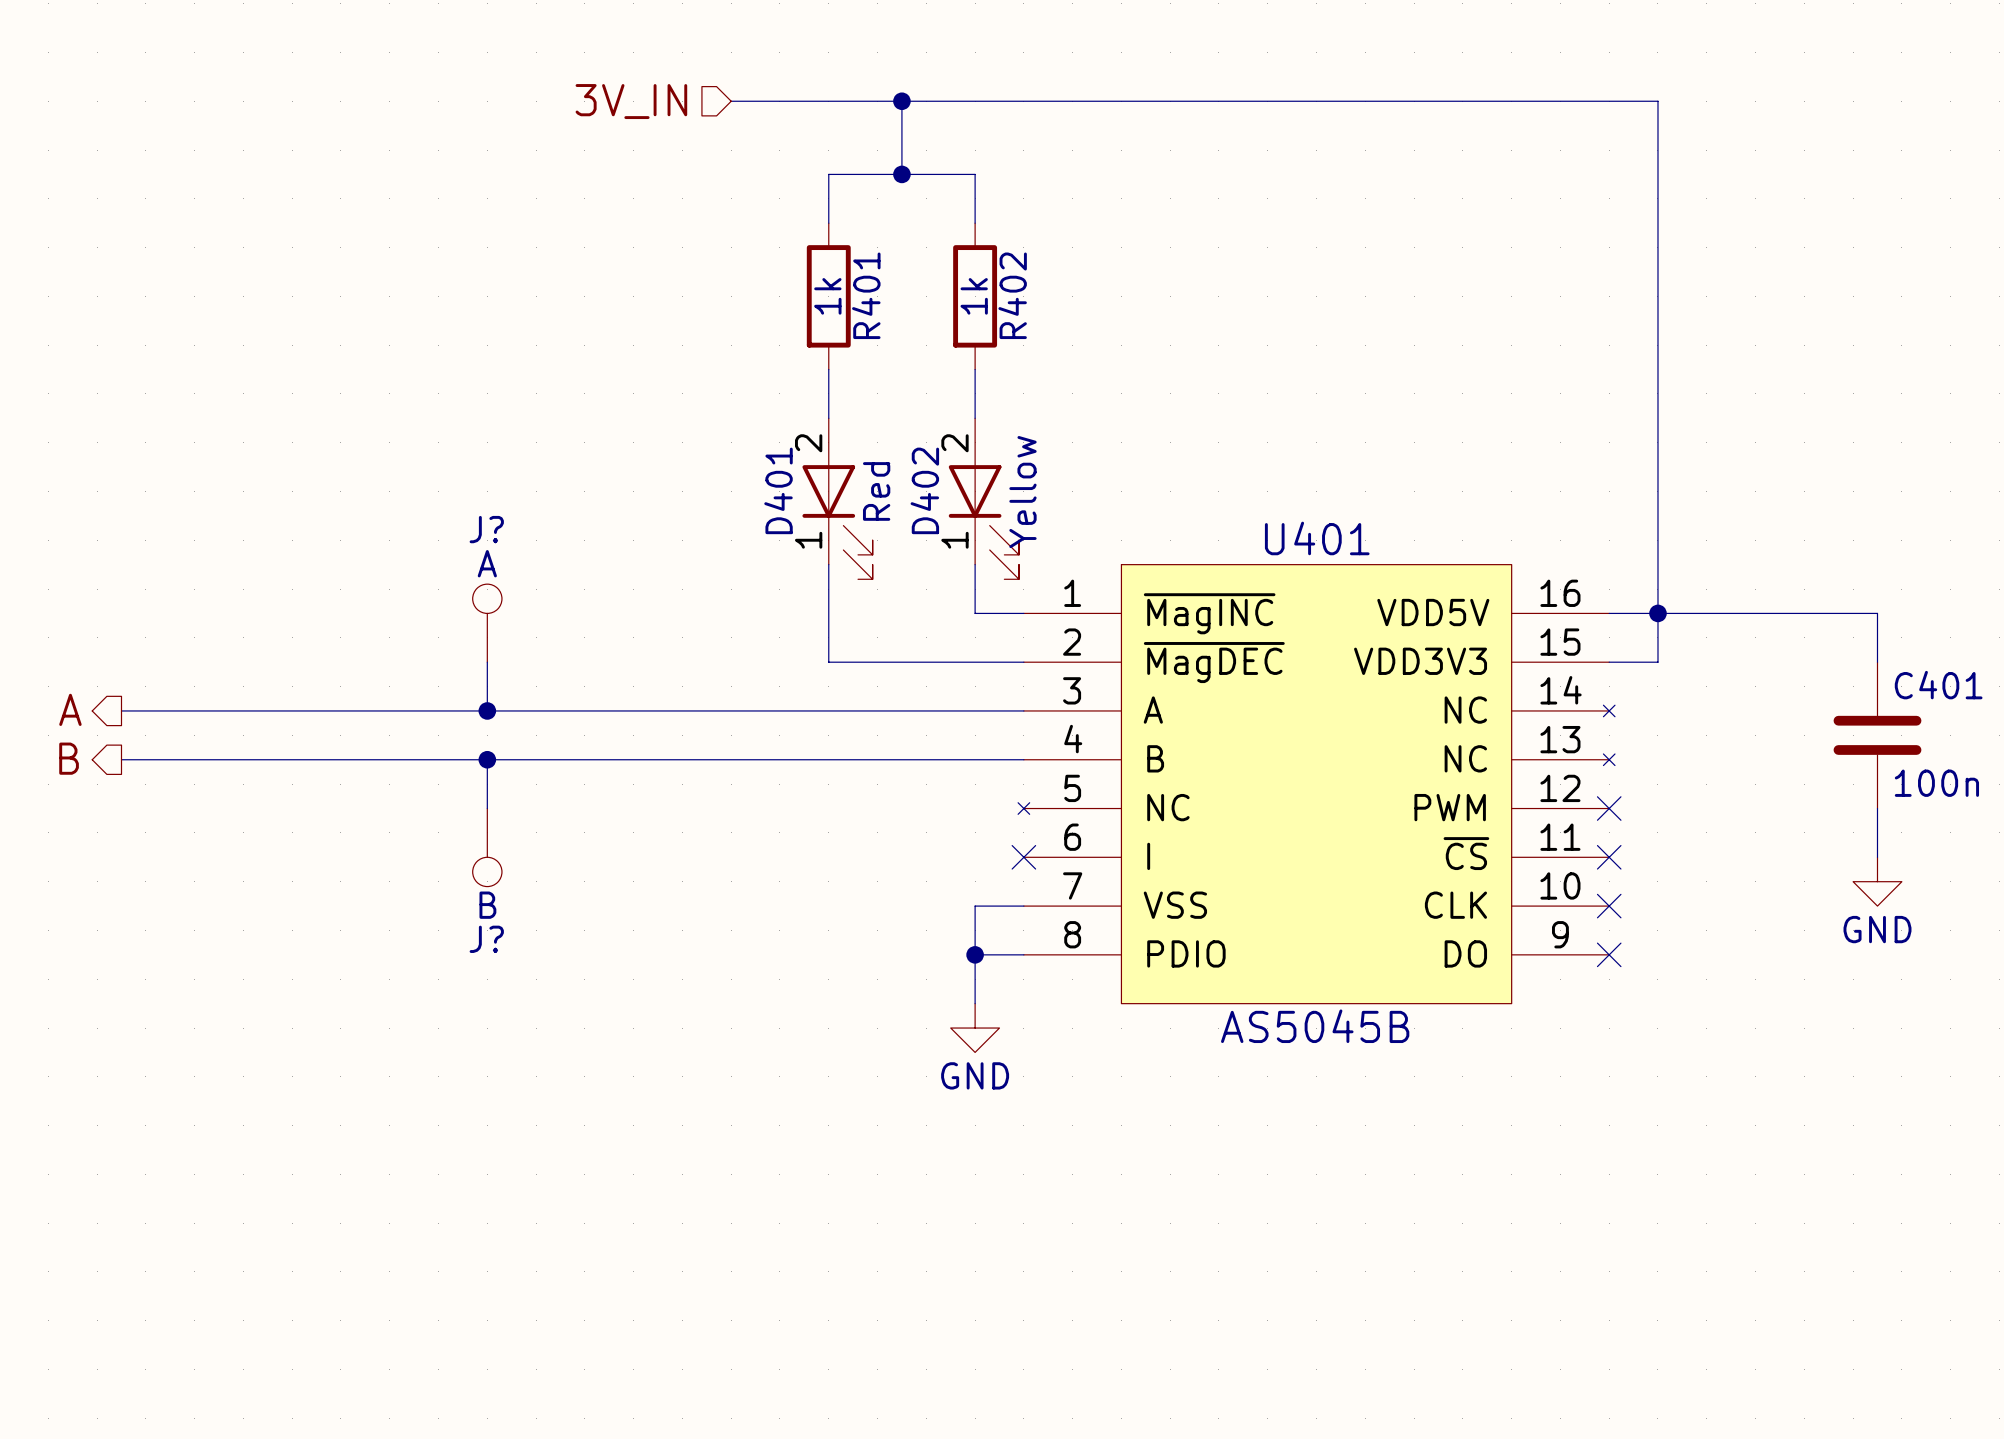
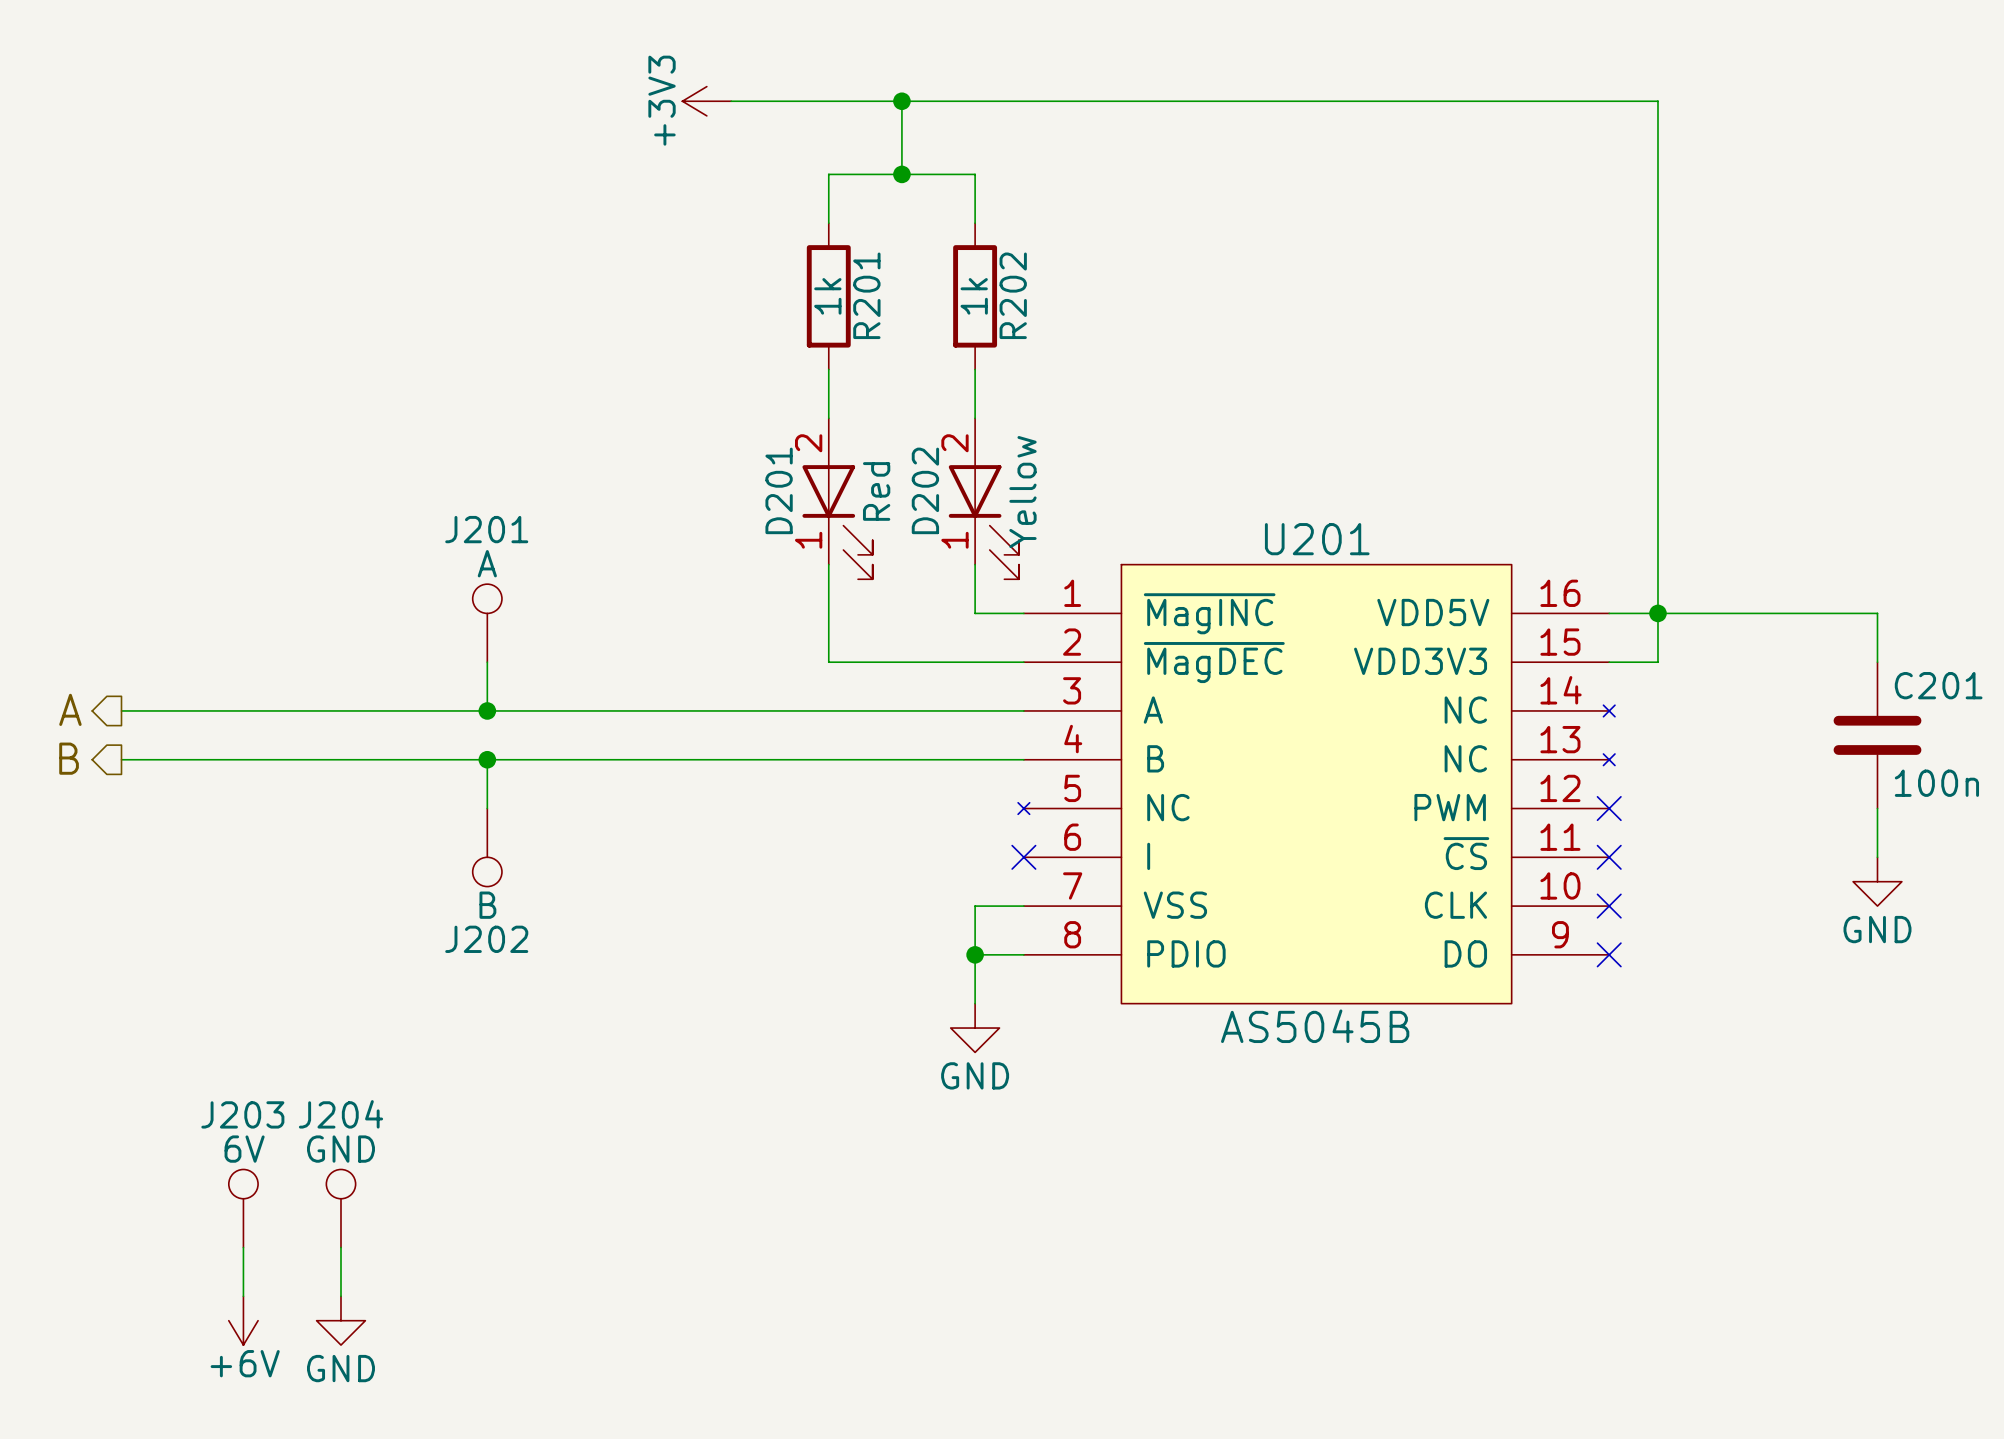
hierarchical label: 3V_IN (631, 101) -> none
power symbol: none -> +3V3 (706, 101)
R401 name: R401 (866, 295) -> R201 (866, 295)
R402 name: R402 (1012, 295) -> R202 (1013, 295)
D401 name: D401 (778, 490) -> D201 (779, 490)
D402 name: D402 (924, 490) -> D202 (925, 490)
J? name: J? (486, 529) -> J201 (486, 529)
U401 name: U401 (1317, 538) -> U201 (1317, 539)
C401 name: C401 (1938, 685) -> C201 (1938, 685)
J? name: J? (486, 939) -> J202 (486, 939)
J203: none -> 6V (243, 1208)
J204: none -> GND (340, 1208)
wire: none -> (243, 1247) (243, 1296)
wire: none -> (340, 1247) (340, 1296)
power symbol: none -> +6V (243, 1320)
power symbol: none -> GND (340, 1320)

